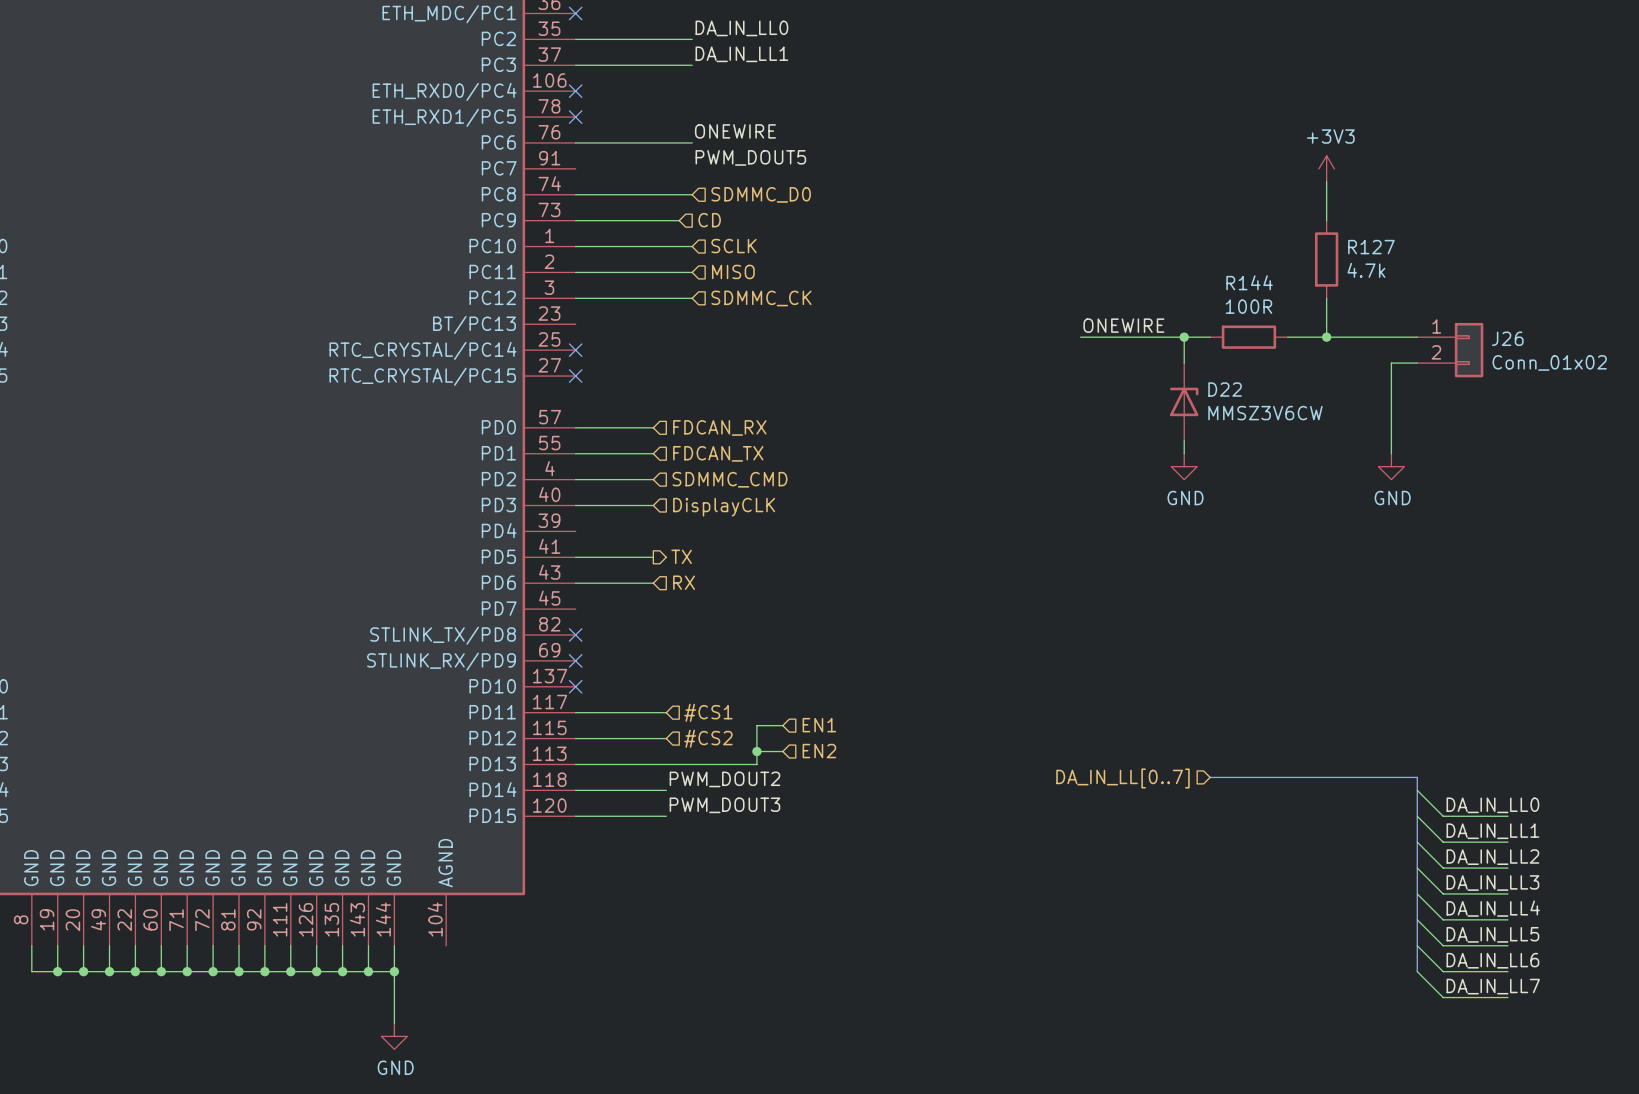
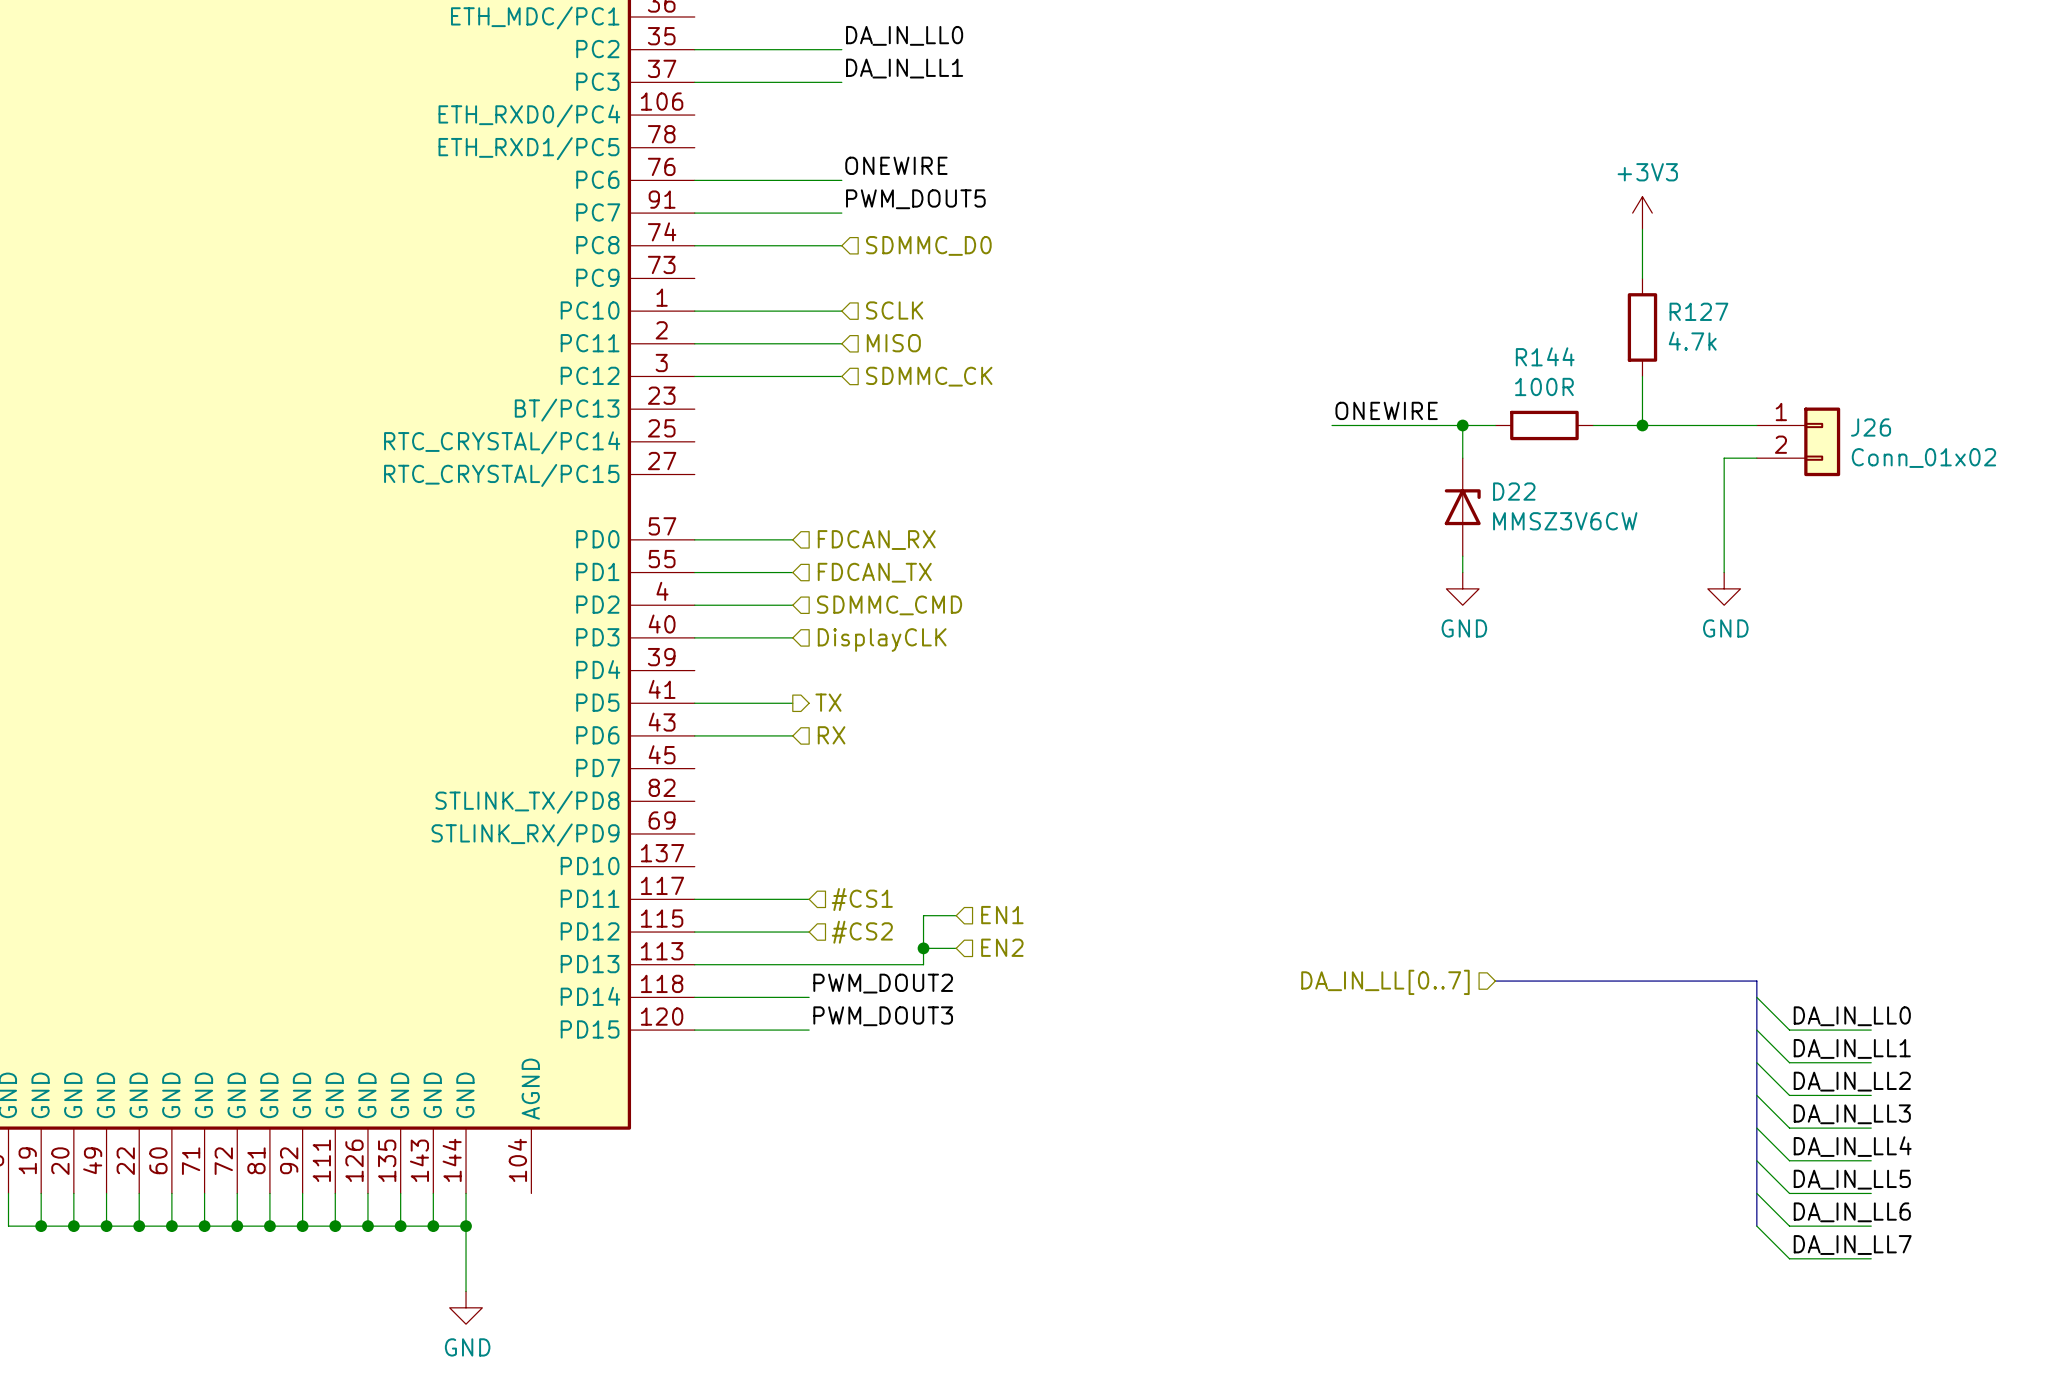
no-connect mark: (575, 13) -> none
no-connect mark: (575, 91) -> none
no-connect mark: (575, 117) -> none
wire: none -> (694, 213) (841, 213)
wire: (575, 220) (679, 220) -> none
hierarchical label: CD (709, 220) -> none
no-connect mark: (575, 350) -> none
no-connect mark: (575, 376) -> none
no-connect mark: (575, 634) -> none
no-connect mark: (575, 660) -> none
no-connect mark: (575, 686) -> none

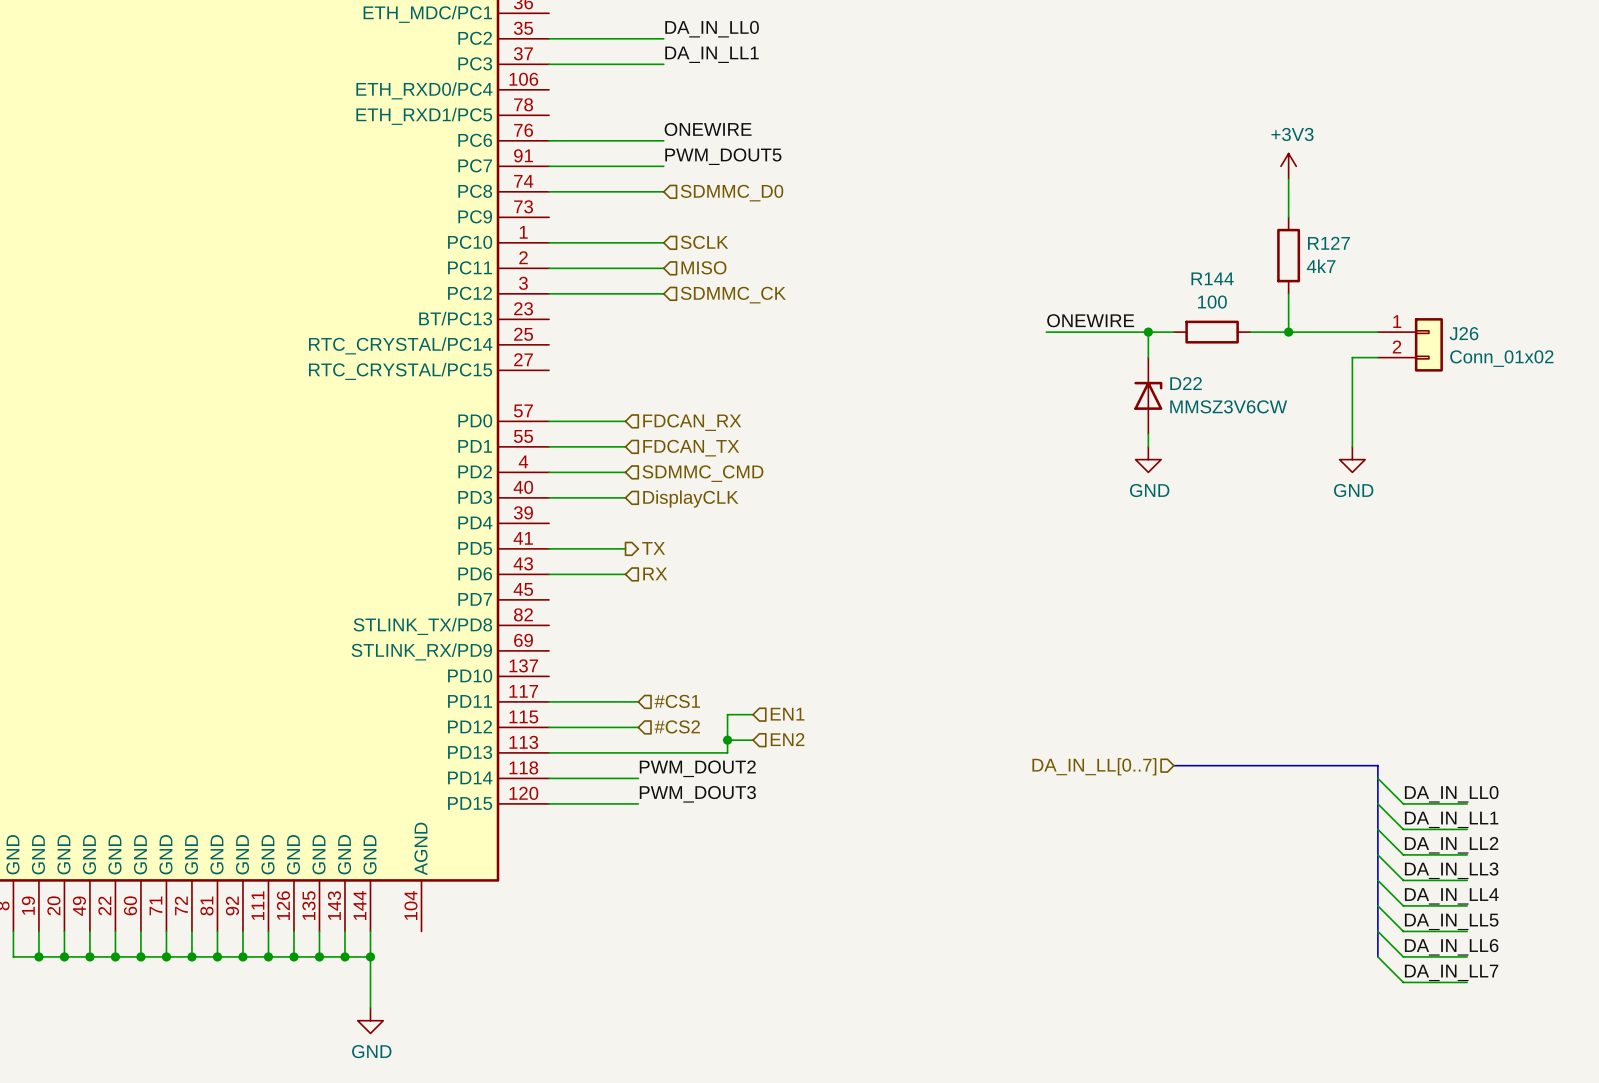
R127 value: 4.7k (1692, 341) -> 4k7 (1321, 266)
R144 value: 100R (1544, 386) -> 100 (1212, 302)

